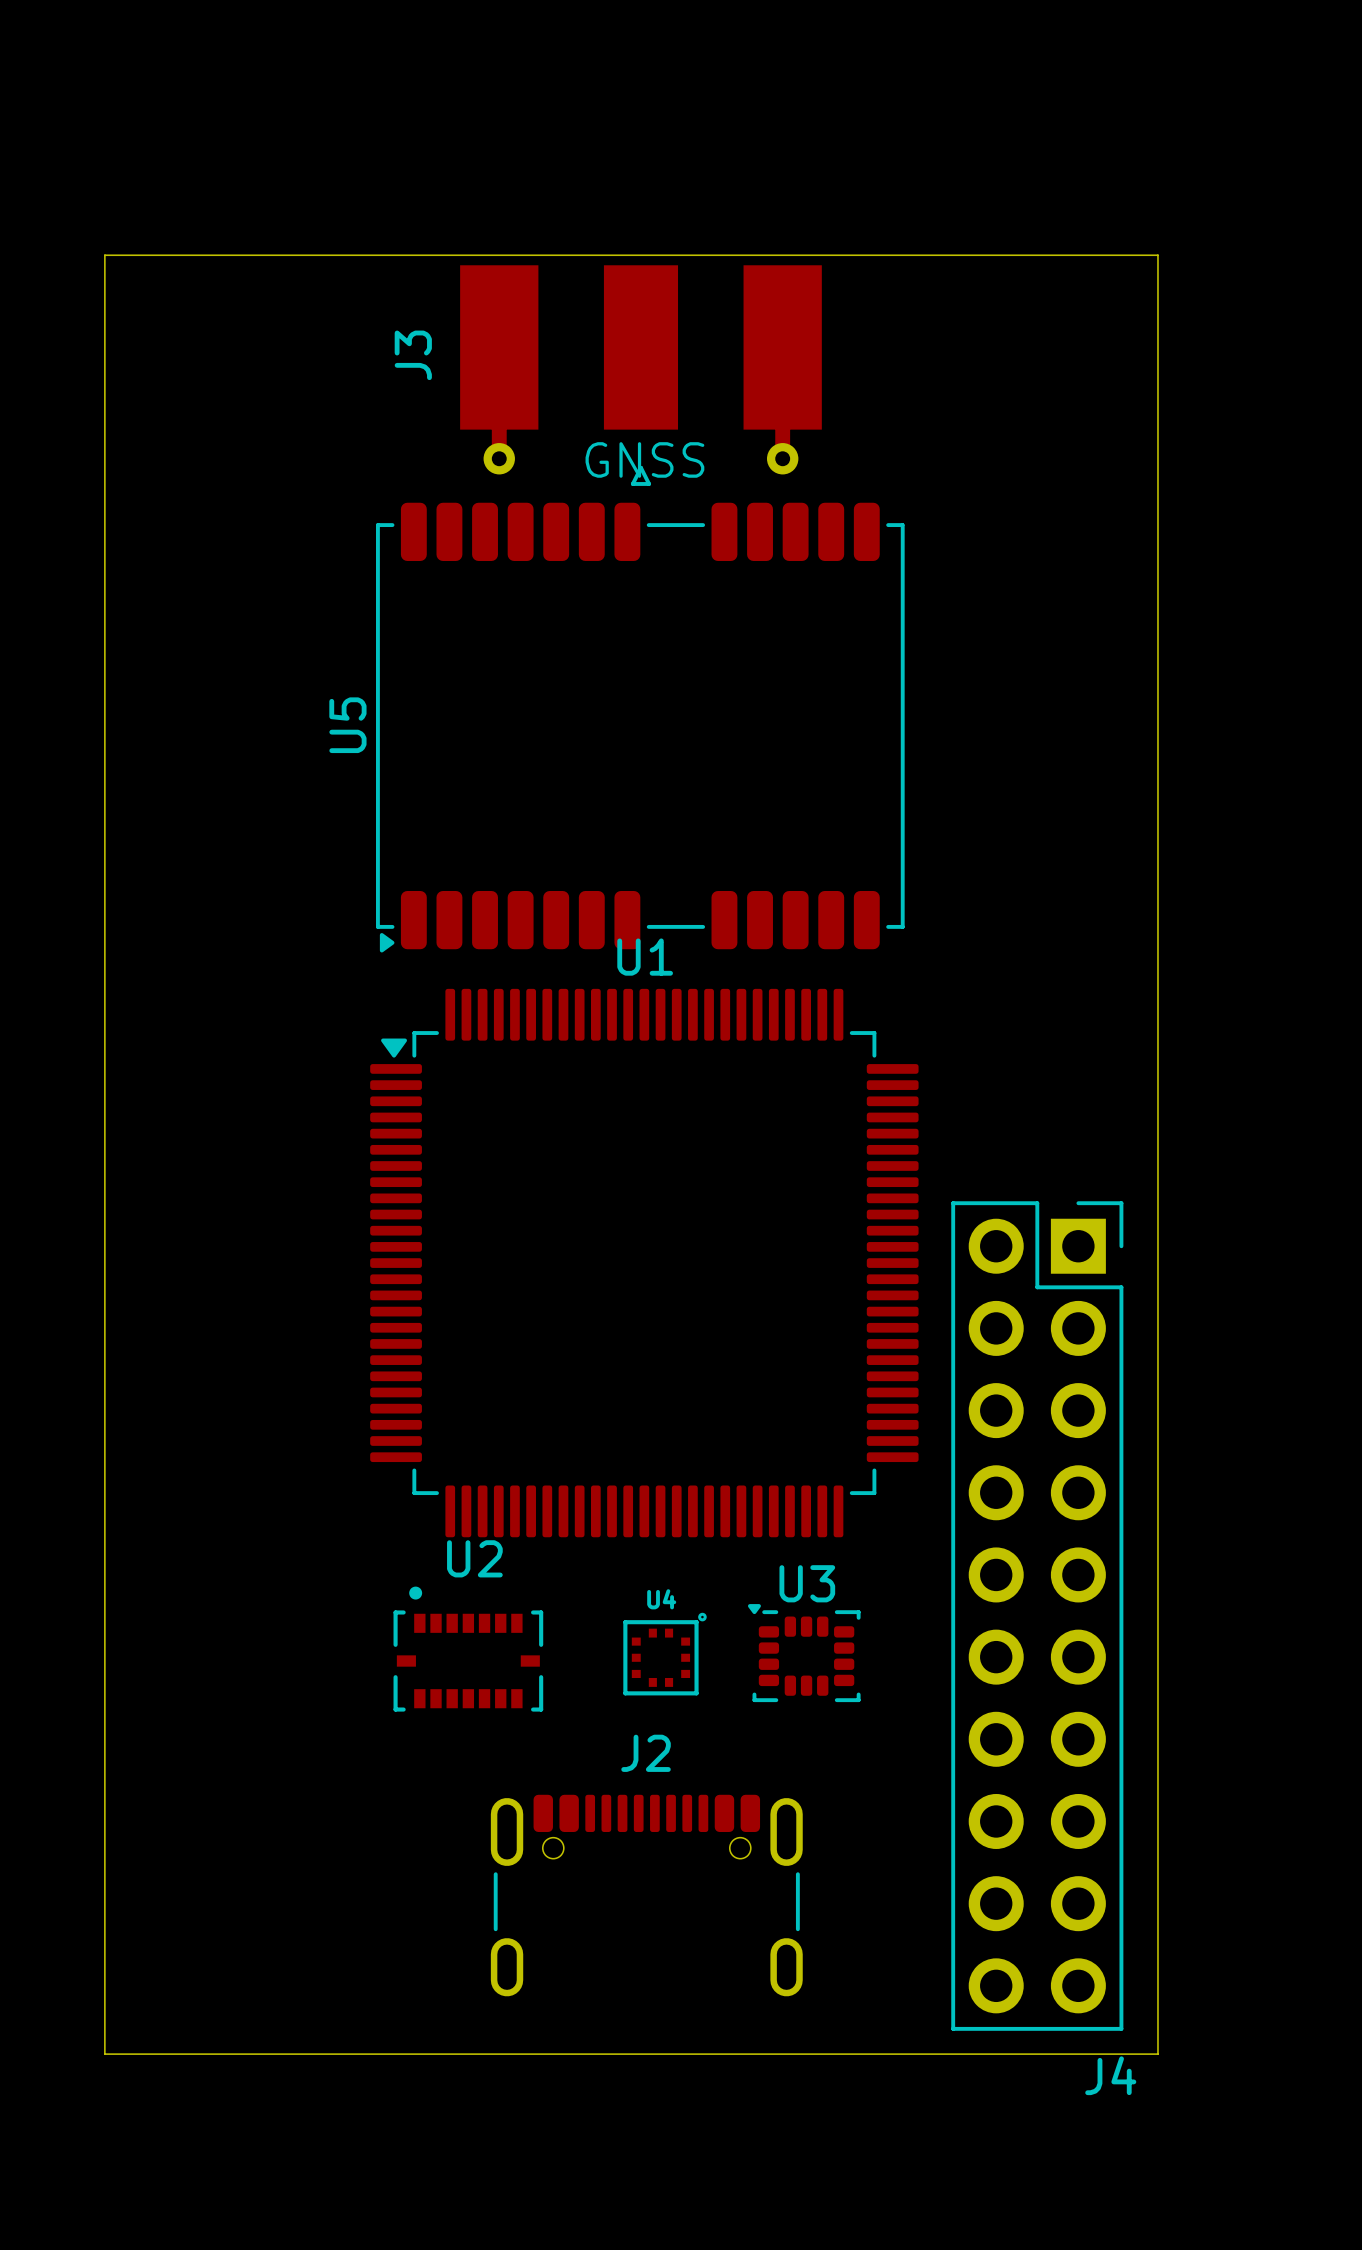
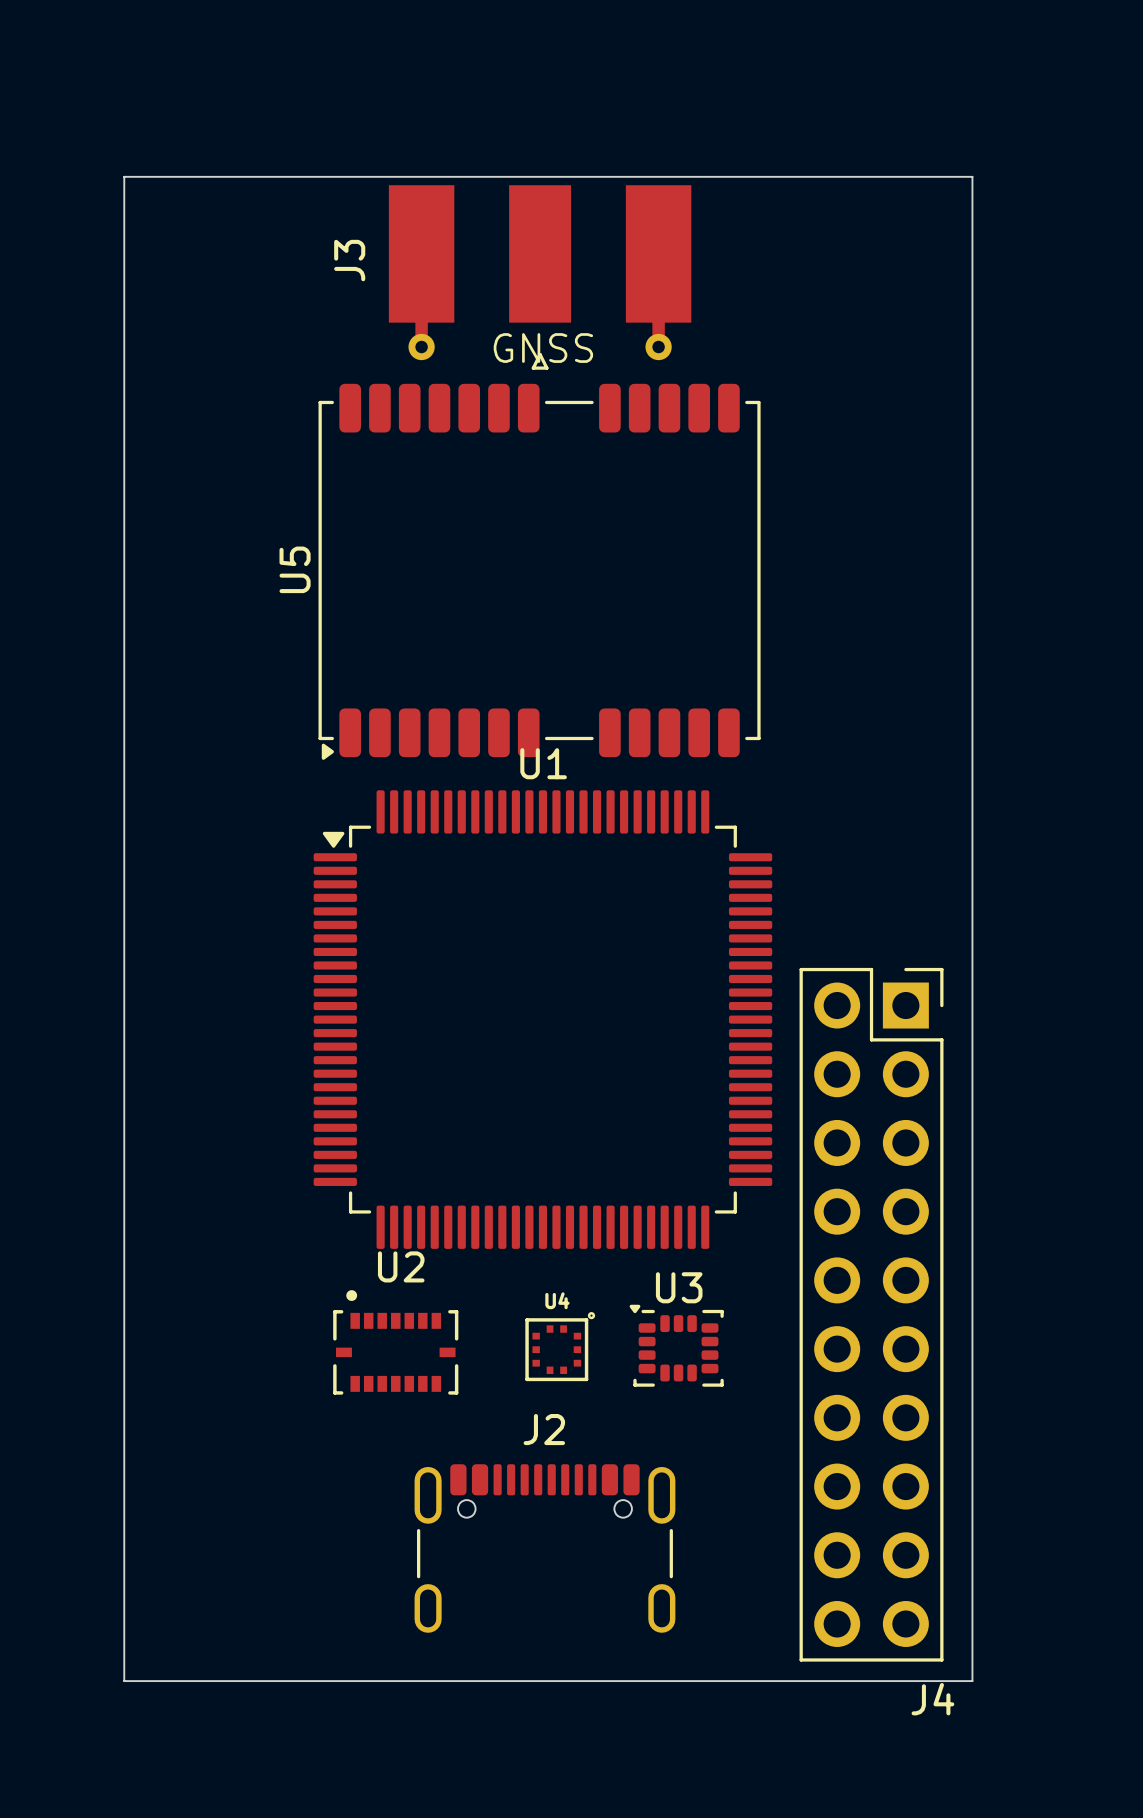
board edge: (143, 255) (104, 255) (104, 2054) (143, 2054) -> (124, 176) (124, 1681)

